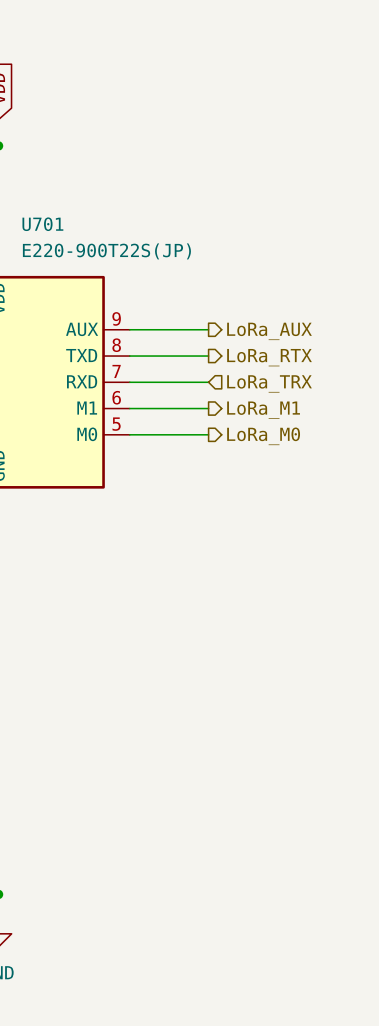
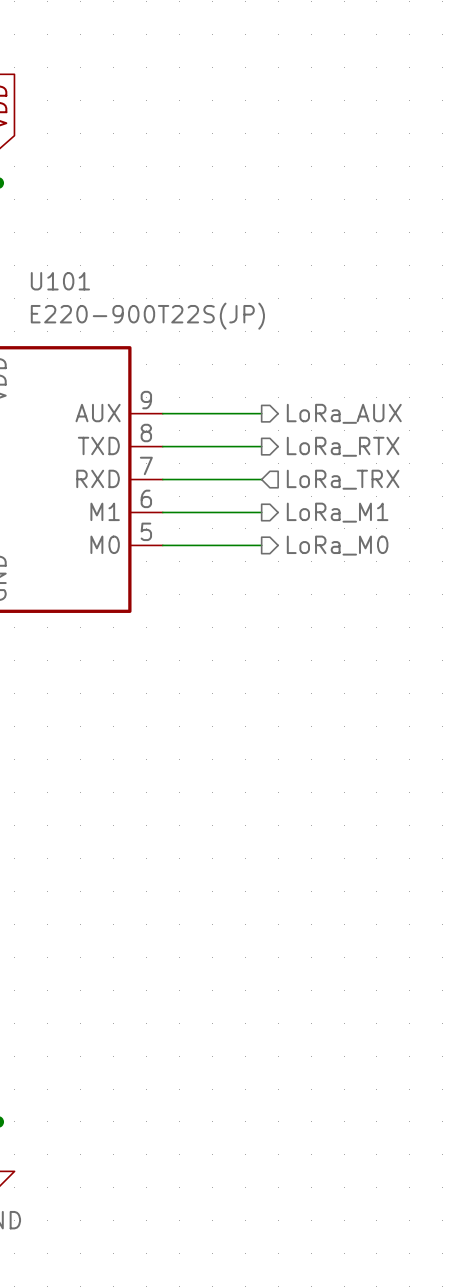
U701 name: U701 (42, 224) -> U101 (60, 281)

